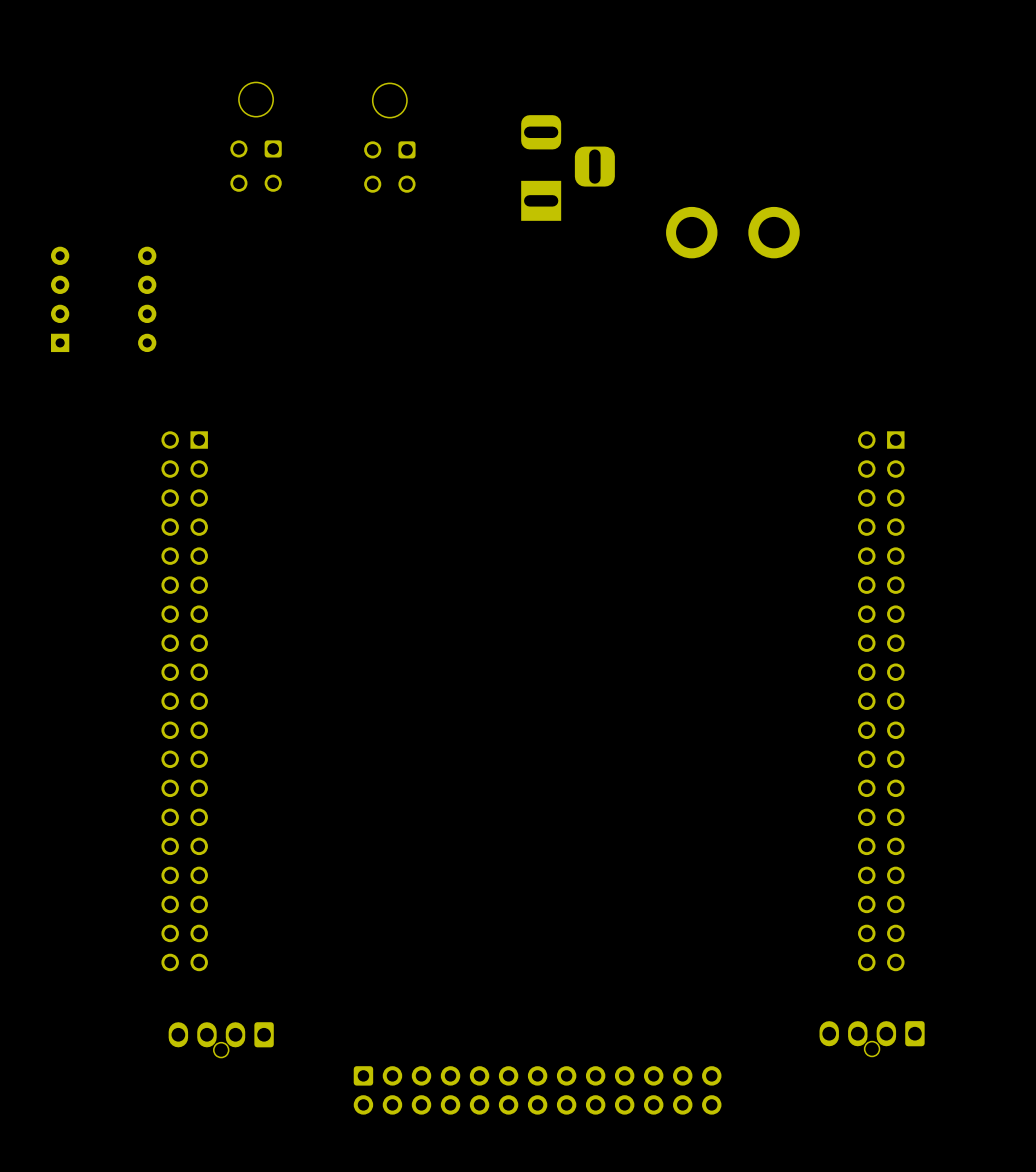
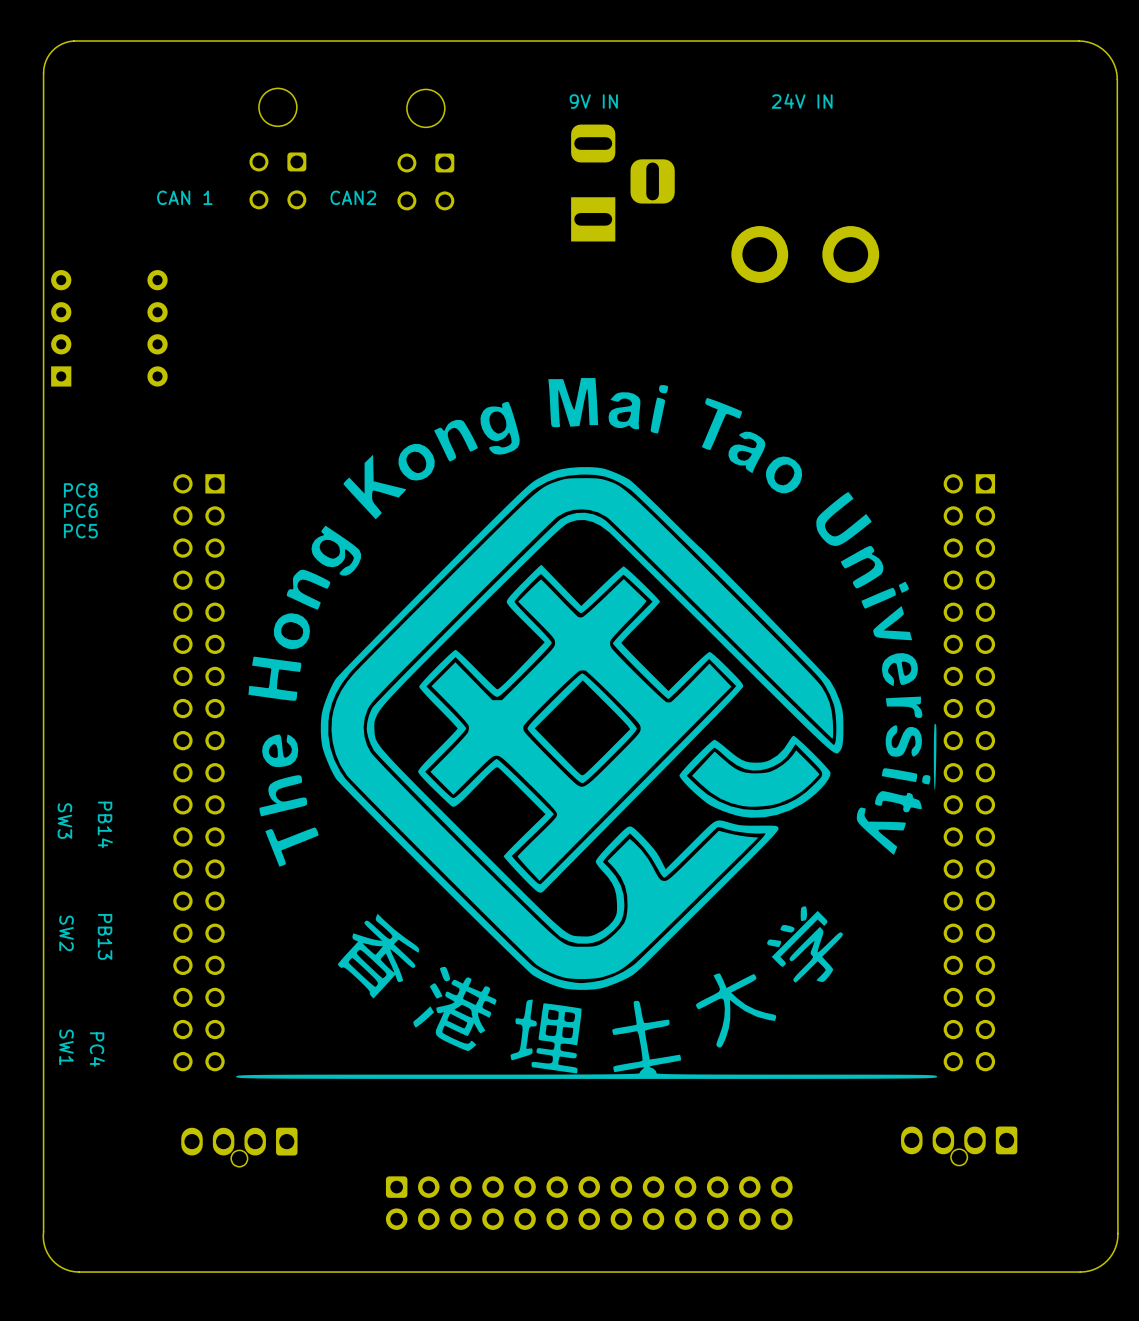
board edge: none -> (1078, 41) (74, 41) (62, 43) (52, 50) (45, 61) (43, 73) (43, 1236) (47, 1252) (55, 1263) (66, 1269) (78, 1272) (1080, 1272) (1096, 1268) (1110, 1257) (1116, 1246) (1117, 1233) (1117, 79) (1114, 64) (1106, 52) (1093, 43) (1078, 41)
text: none -> 9V IN (593, 101)
text: none -> 24V IN (802, 101)
text: none -> CAN 1 (184, 197)
text: none -> CAN2 (353, 197)
drawing: none -> [236, 378, 938, 1079]
text: none -> PC8 (80, 490)
text: none -> PC6 (80, 510)
text: none -> PC5 (80, 531)
SW3: none -> (64, 821)
text: none -> PB14 (105, 824)
SW2: none -> (66, 933)
text: none -> PB13 (105, 936)
SW1: none -> (66, 1047)
text: none -> PC4 (97, 1049)

